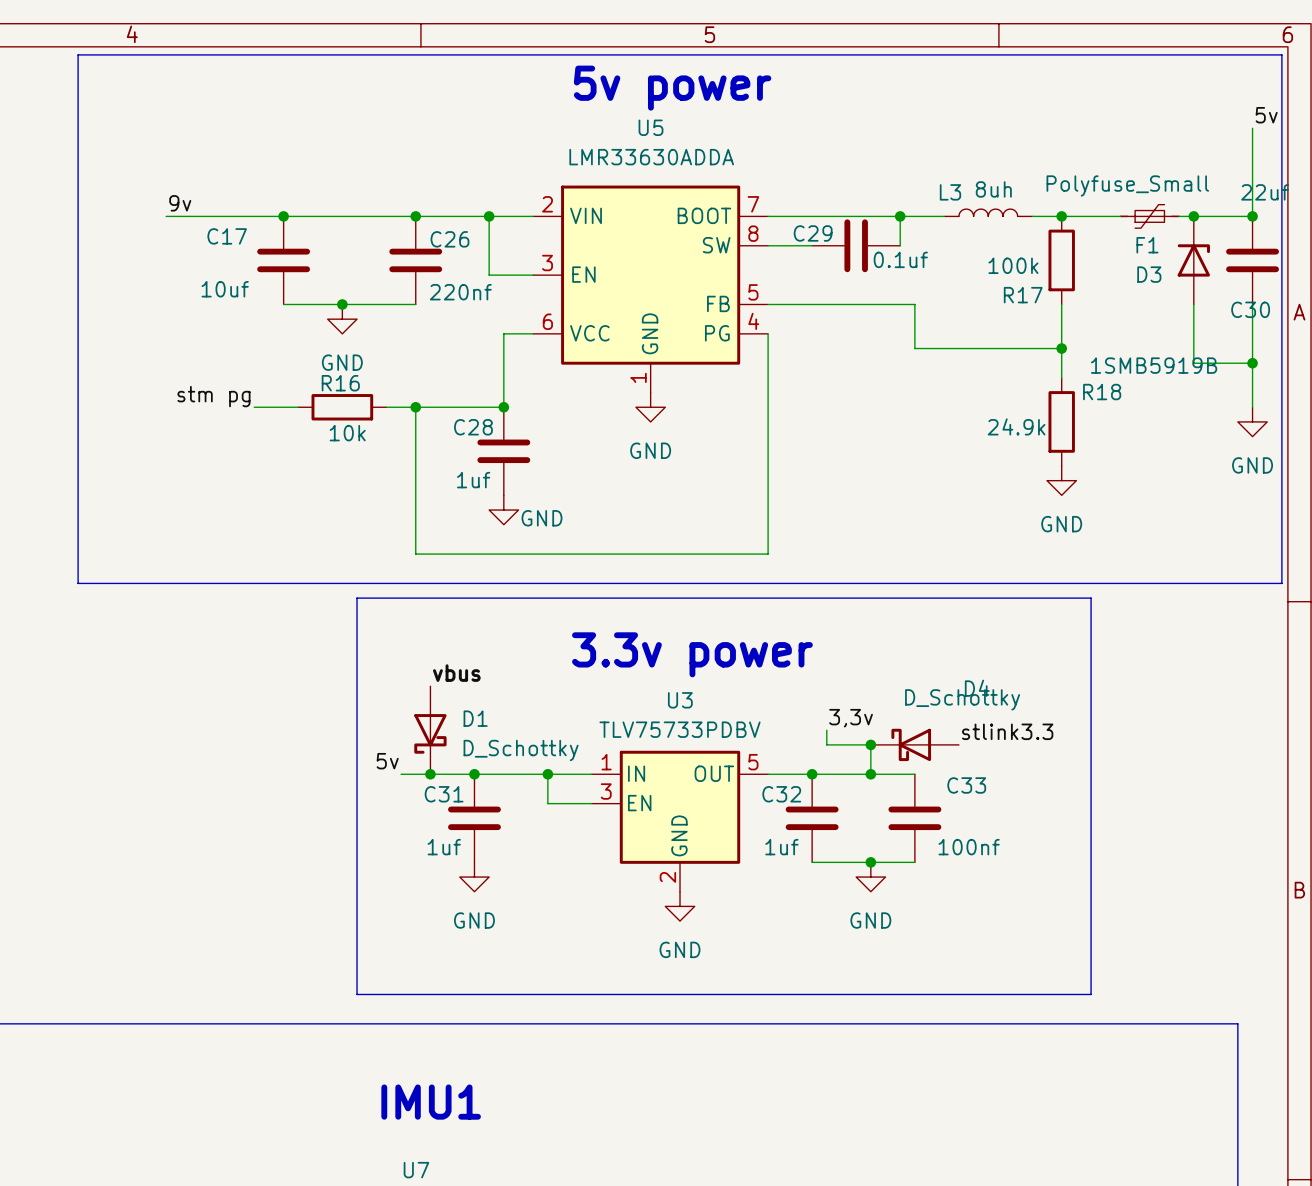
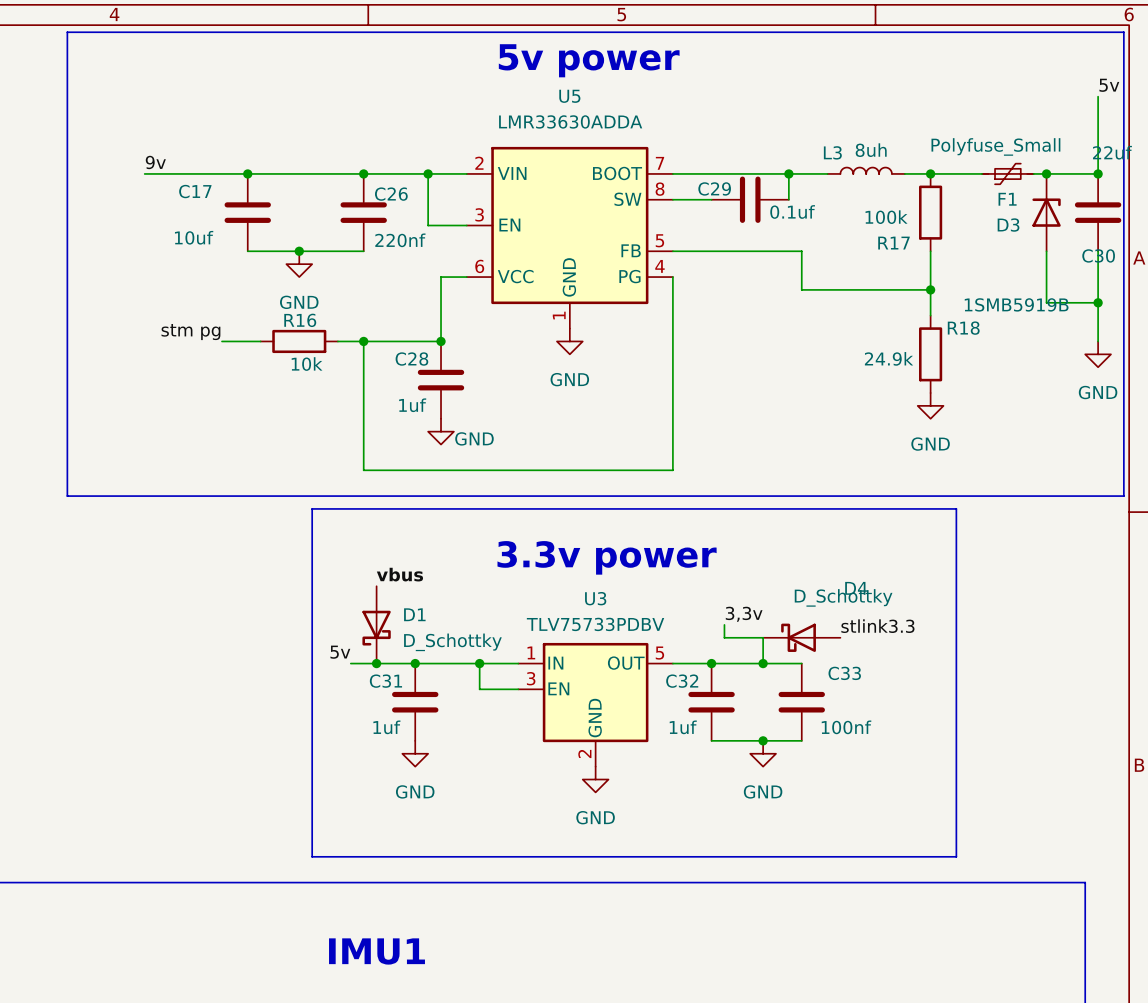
junction: (870, 744) -> none

